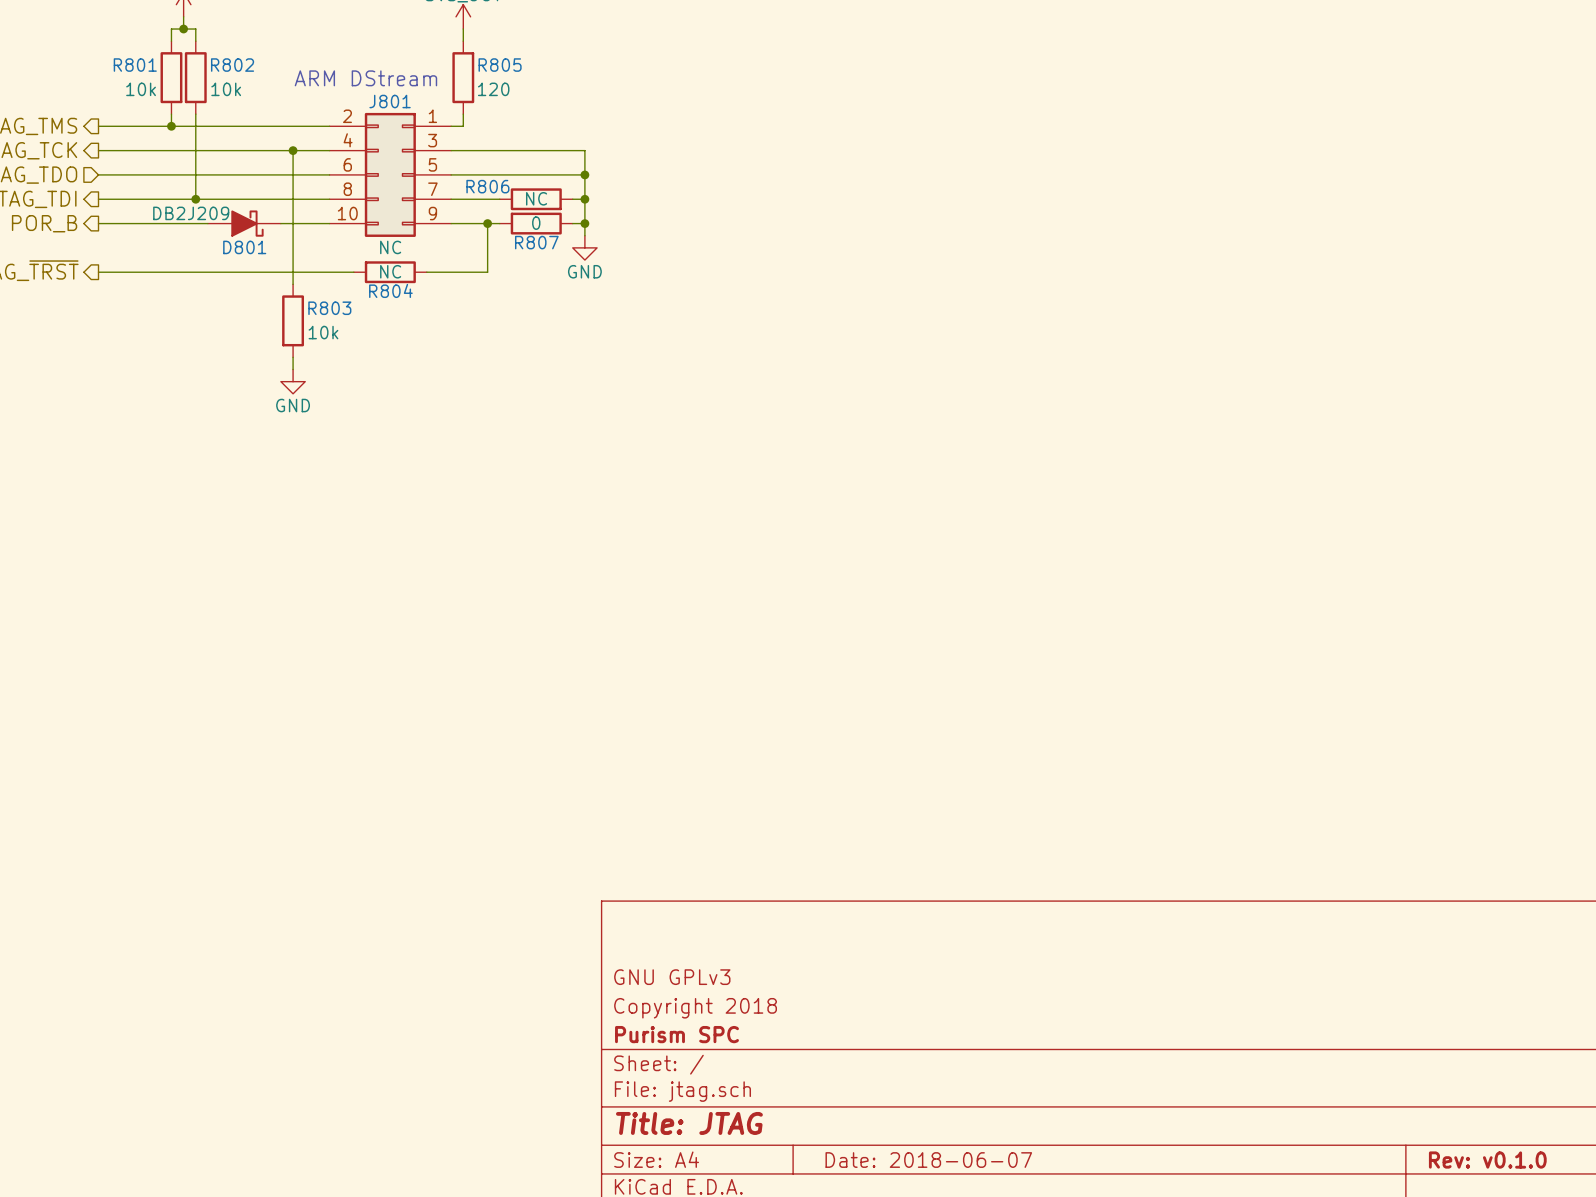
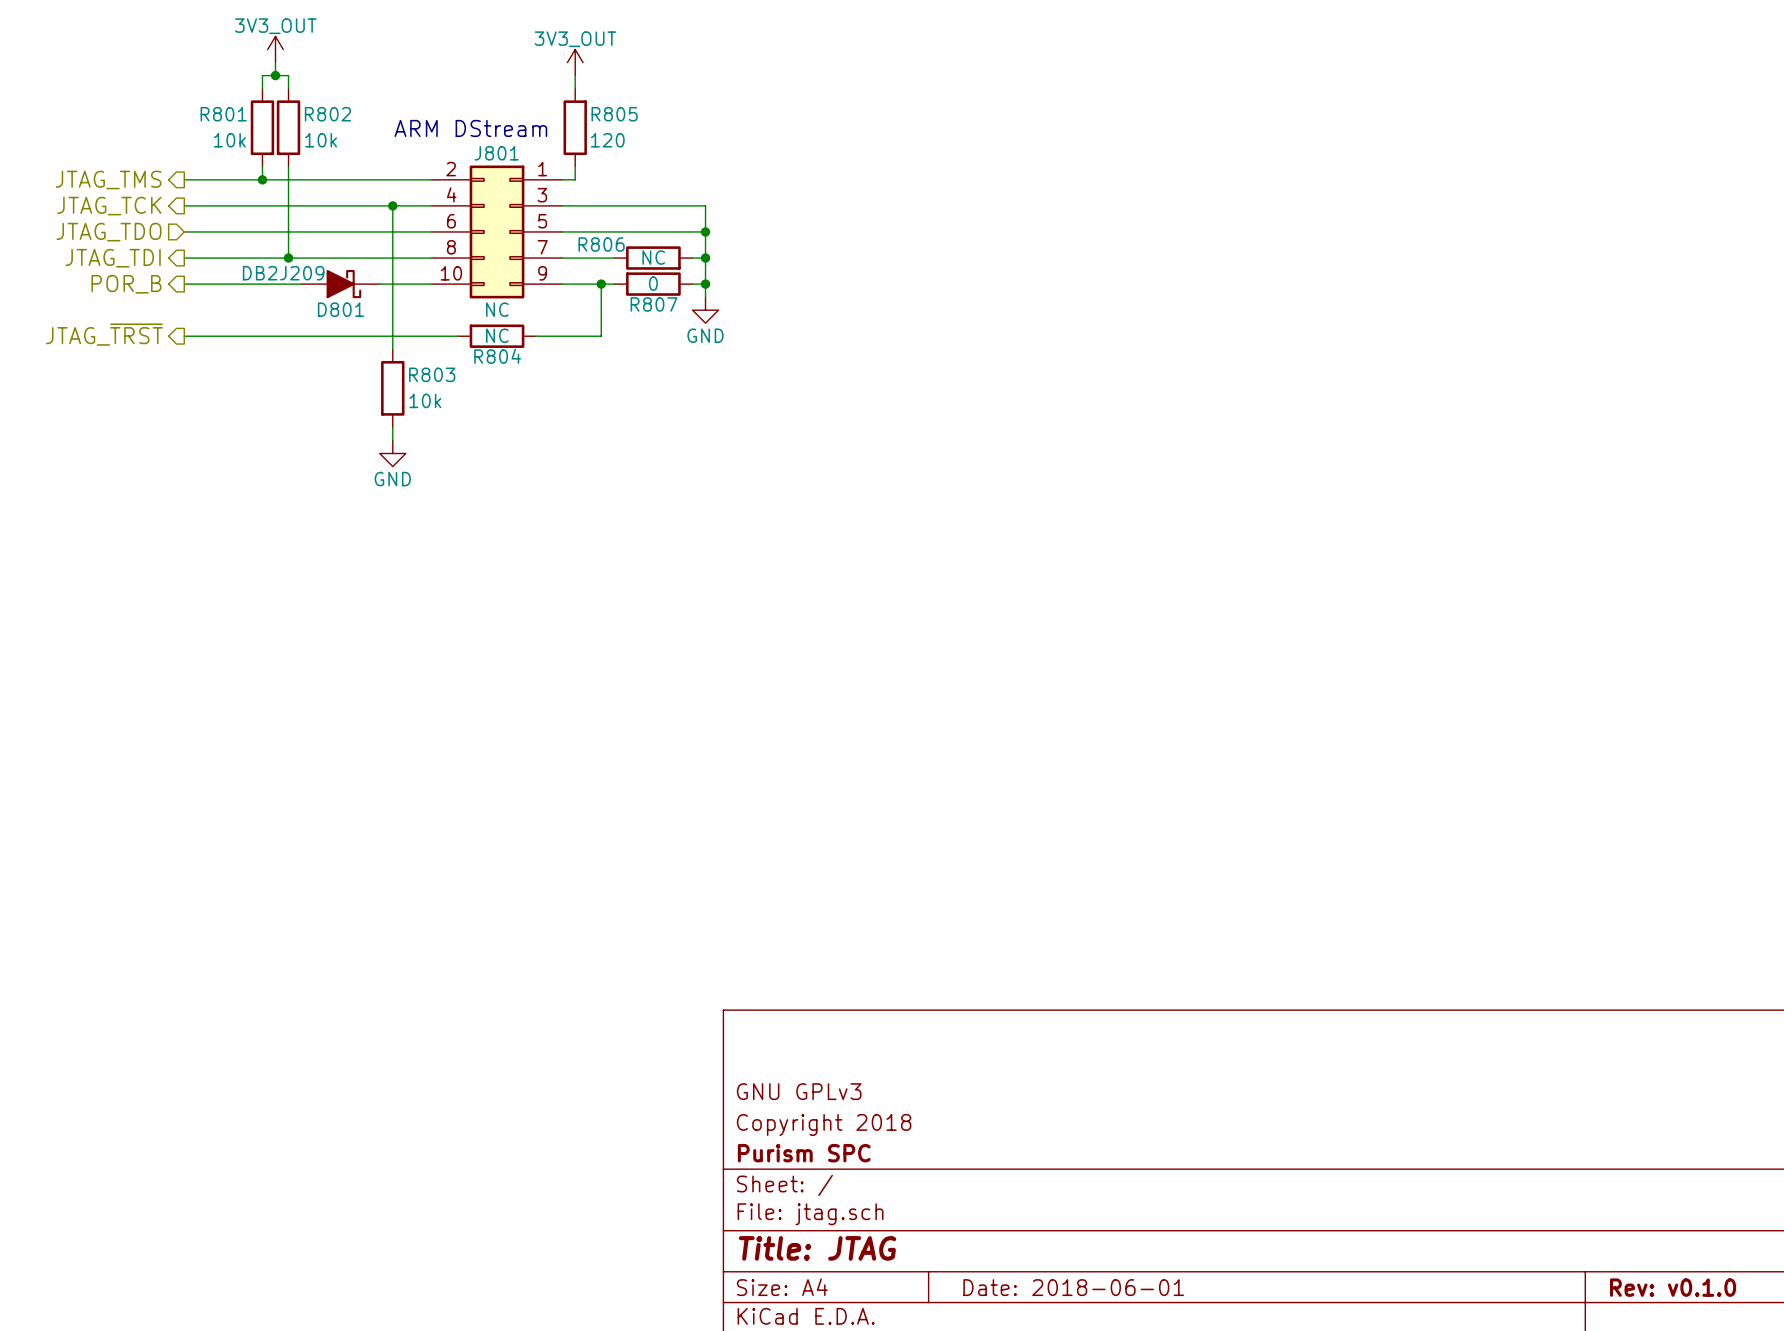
title block: Date: 2018-06-07 (928, 1160) -> Date: 2018-06-01 (1073, 1287)

